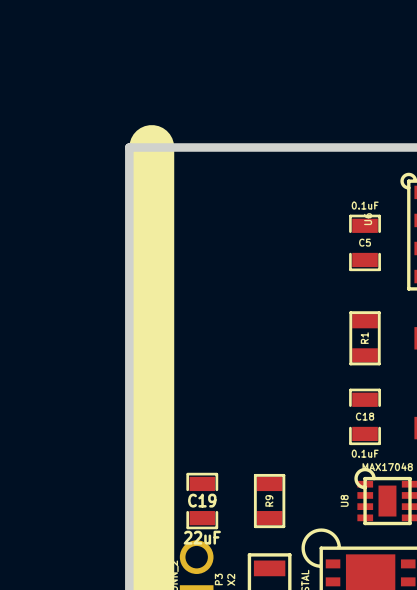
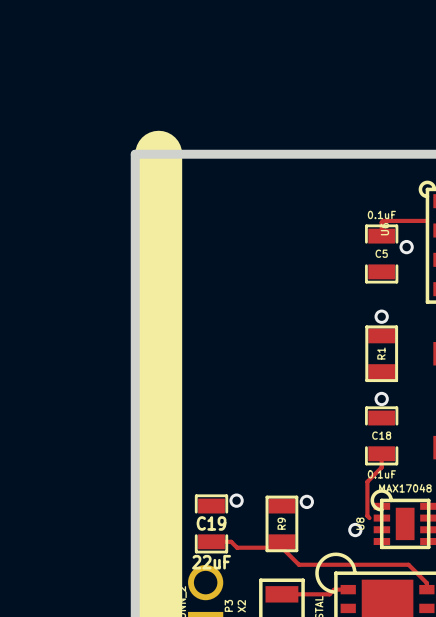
track: none -> (427, 220) (383, 220) (381, 236)
via: none -> (406, 247)
via: none -> (381, 316)
via: none -> (381, 398)
track: none -> (381, 453) (381, 467) (367, 481) (367, 515) (369, 518)
via: none -> (236, 500)
via: none -> (306, 501)
via: none -> (355, 530)
track: none -> (211, 541) (231, 541) (237, 547) (281, 547)
track: none -> (281, 547) (298, 564) (408, 564) (426, 583) (426, 589)
track: none -> (348, 589) (334, 589) (329, 594) (281, 594)

